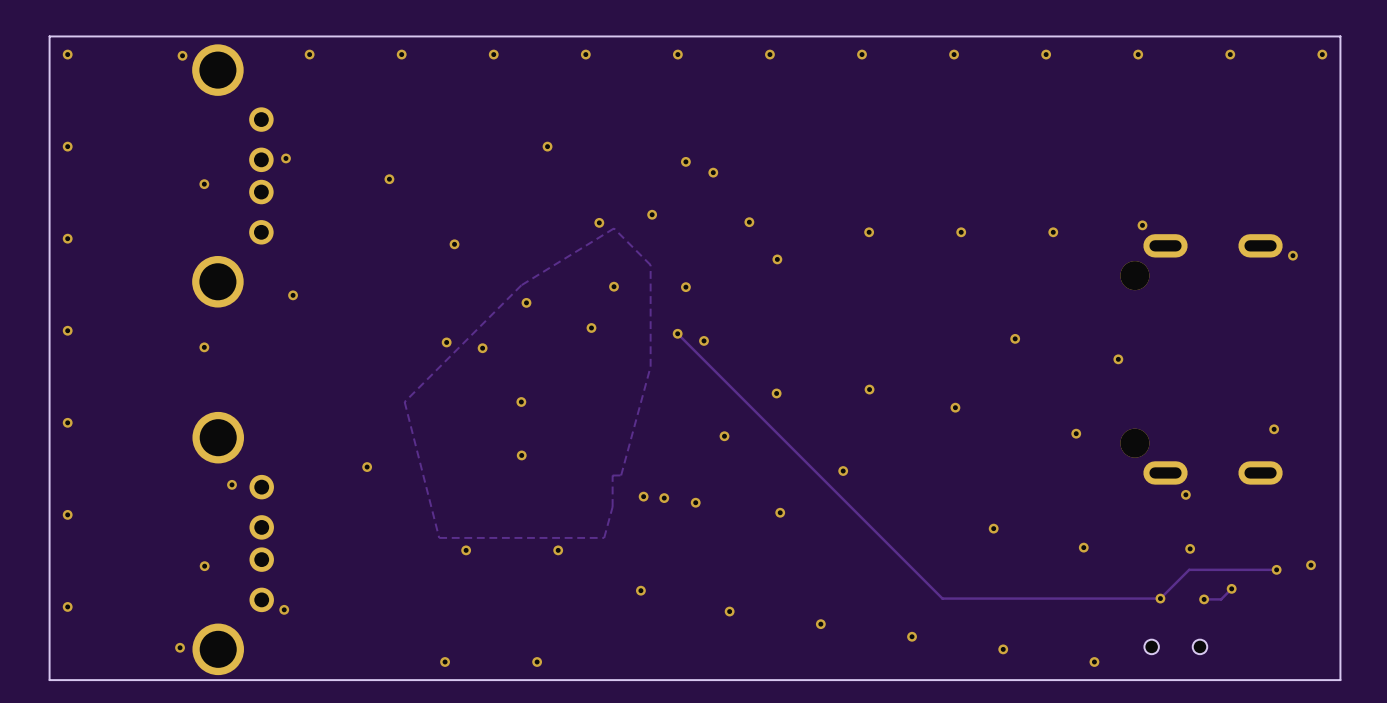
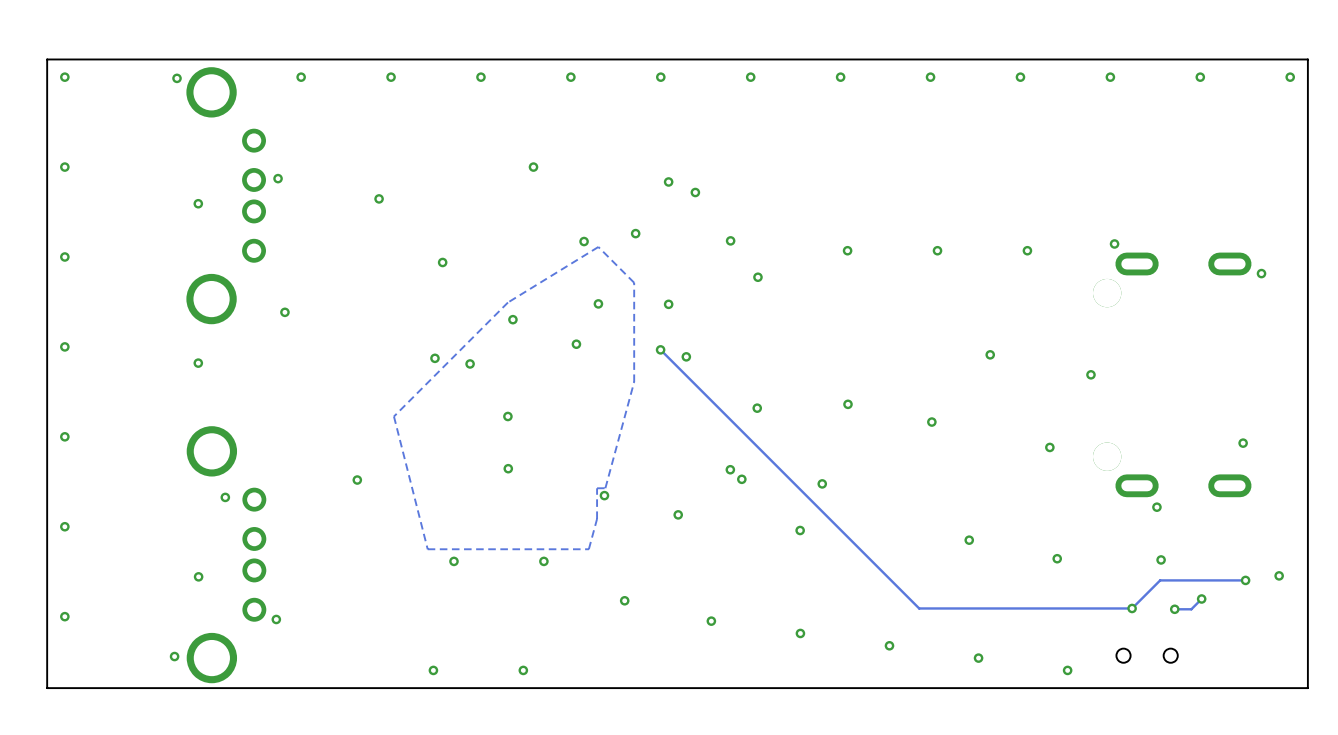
via: (724, 436) -> none
via: none -> (730, 469)
via: none -> (741, 479)
via: none -> (604, 495)
via: (643, 496) -> none
via: (664, 498) -> none
via: (780, 512) -> none
via: none -> (800, 530)

